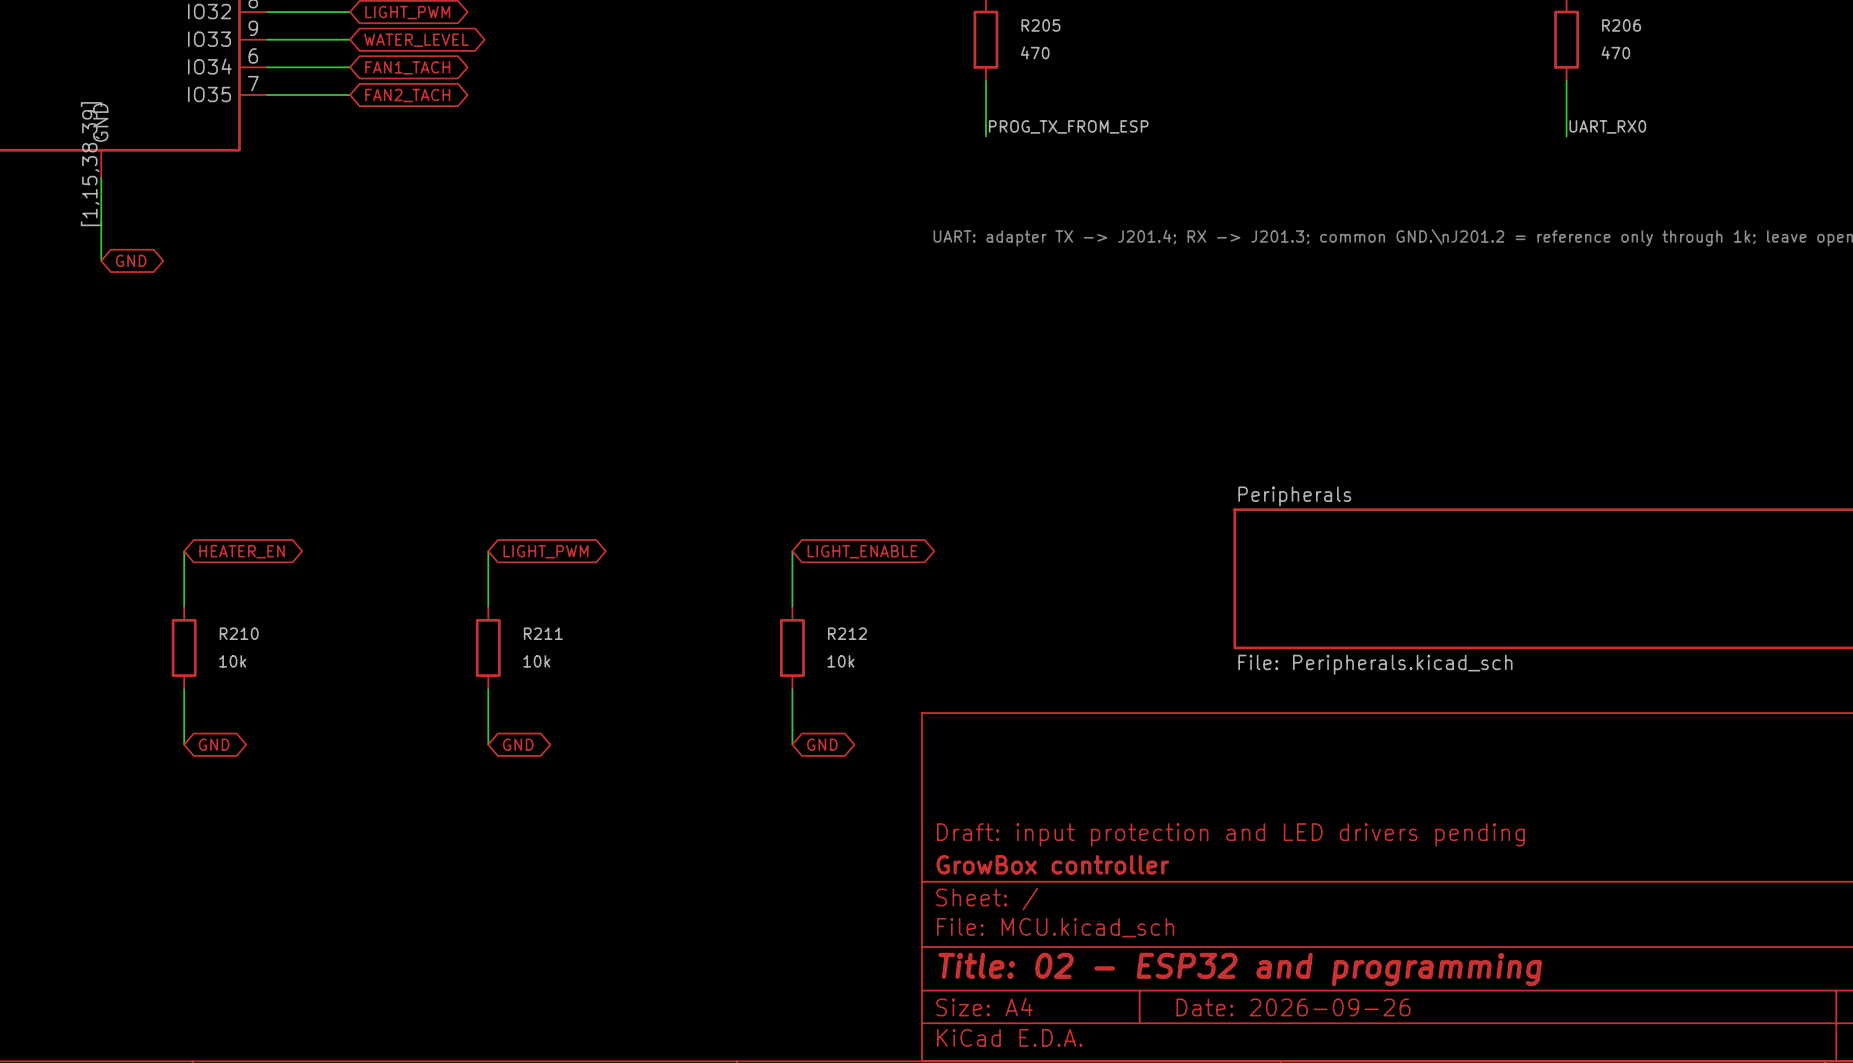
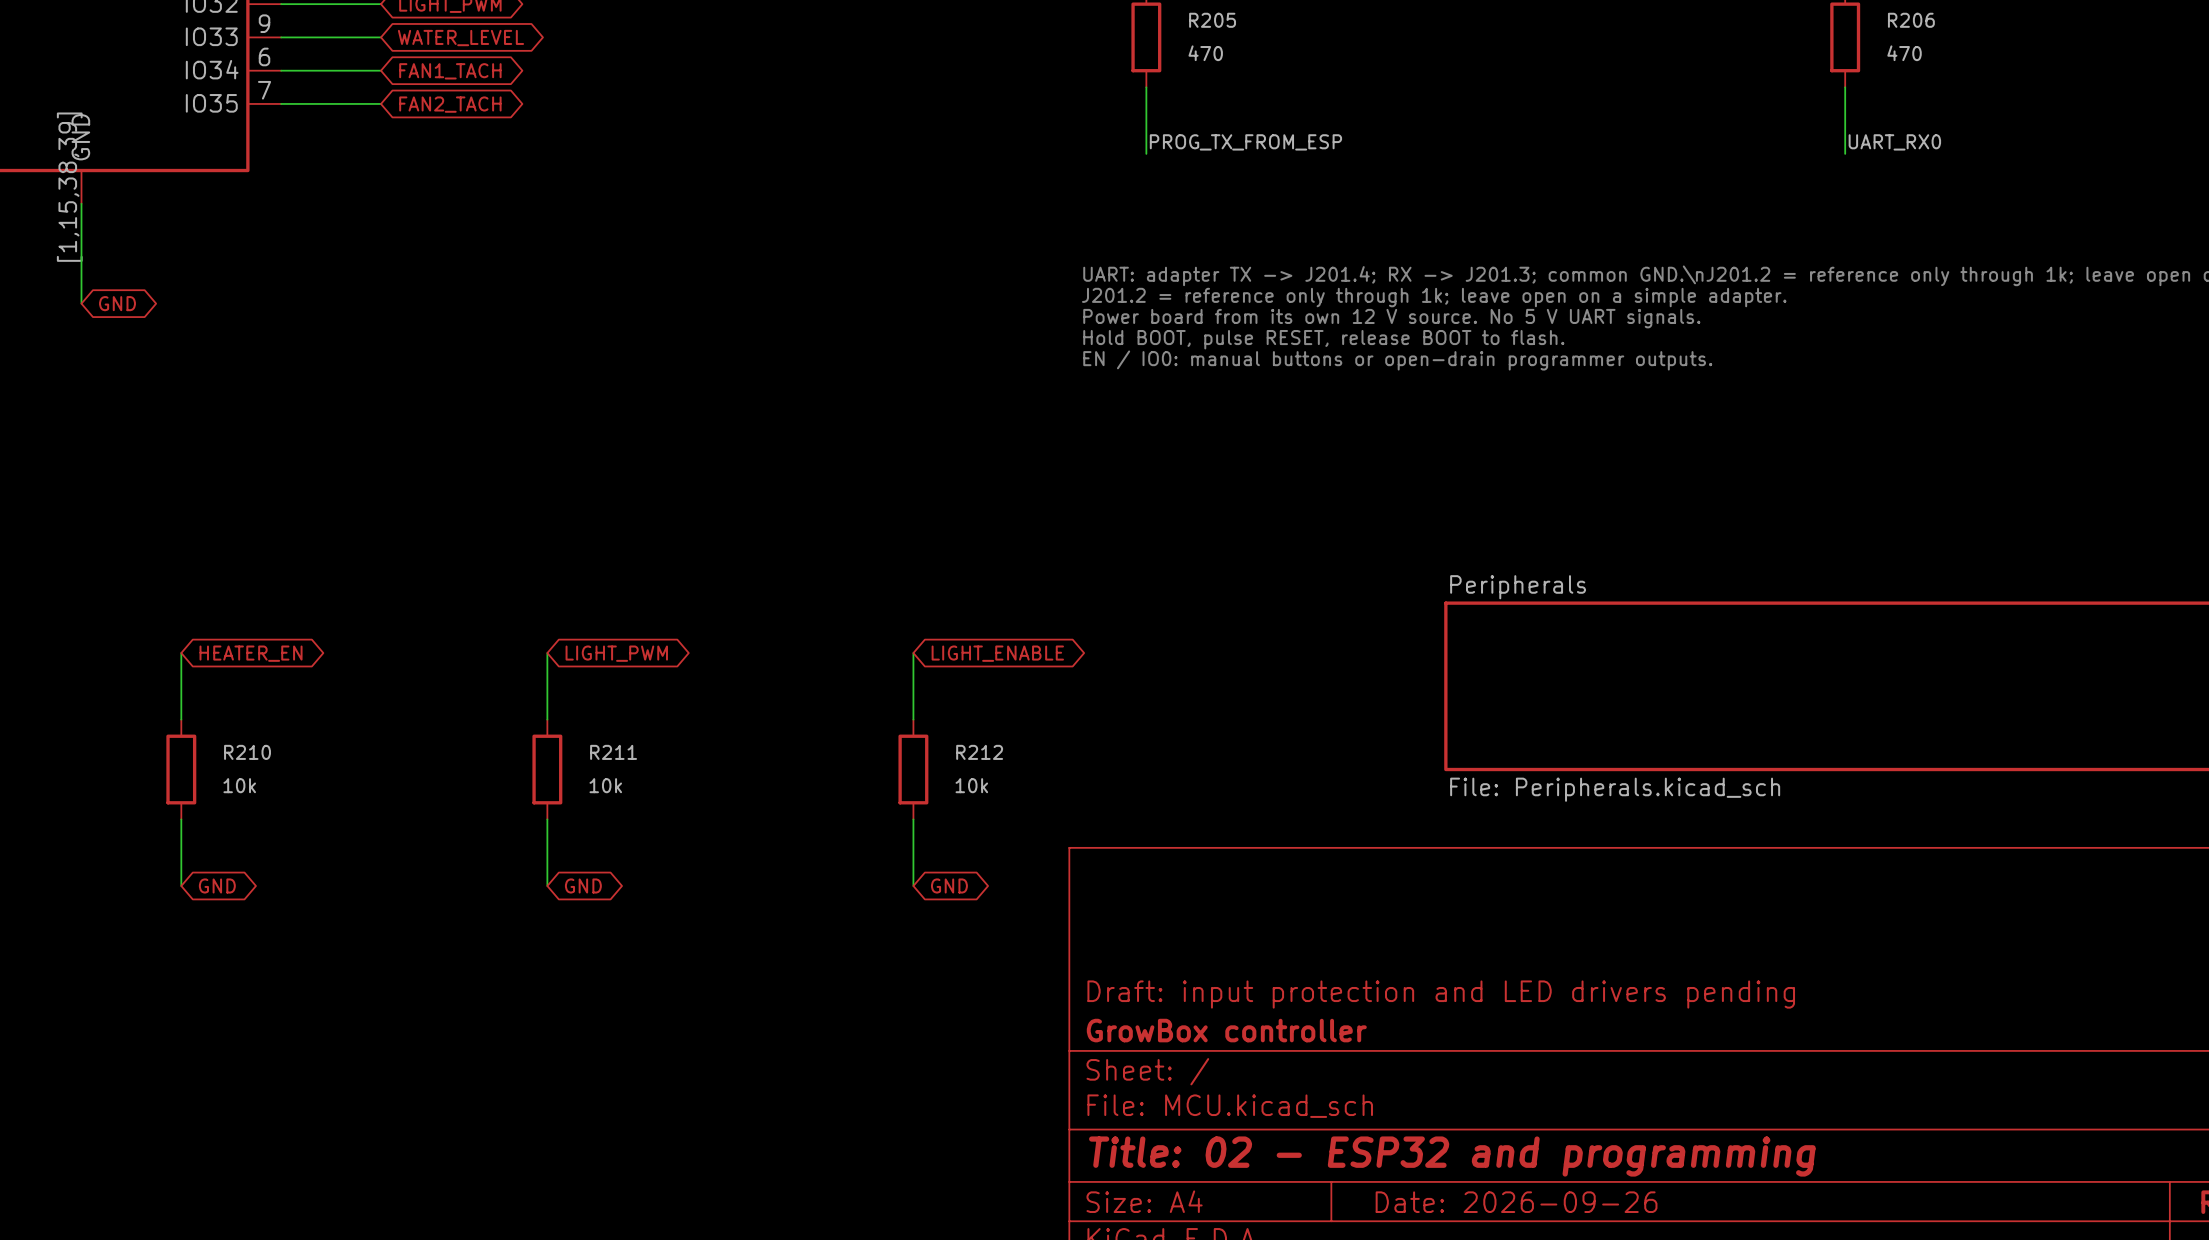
text: none -> J201.2 = reference only through 1k; leave open on a simple adapter. (1434, 297)
text: none -> Power board from its own 12 V source. No 5 V UART signals. (1391, 318)
text: none -> Hold BOOT, pulse RESET, release BOOT to flash. (1323, 339)
text: none -> EN / IO0: manual buttons or open-drain programmer outputs. (1397, 360)

